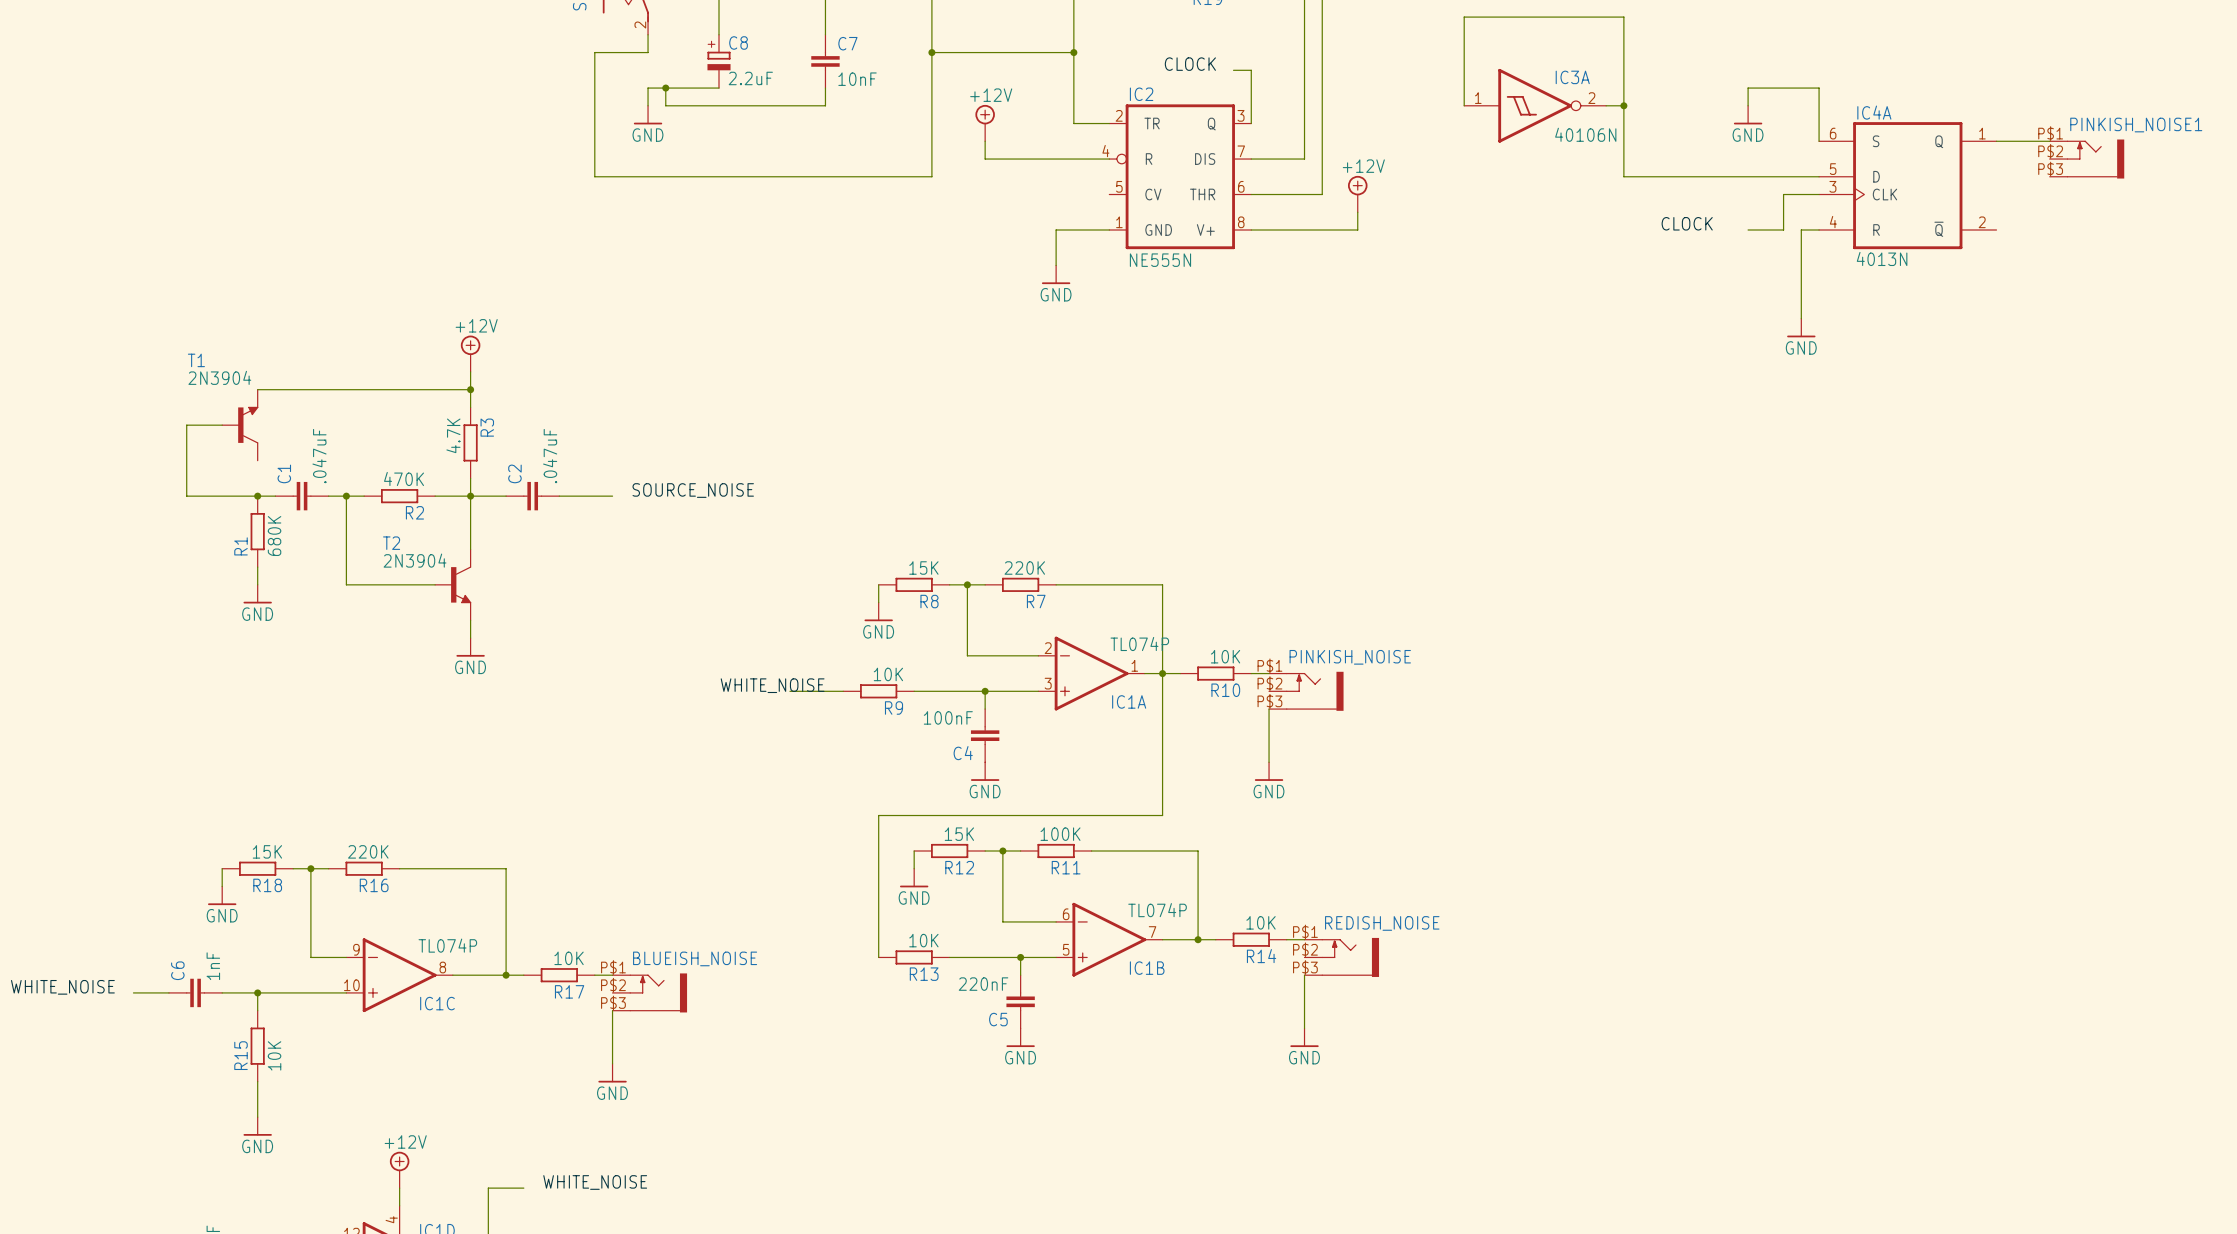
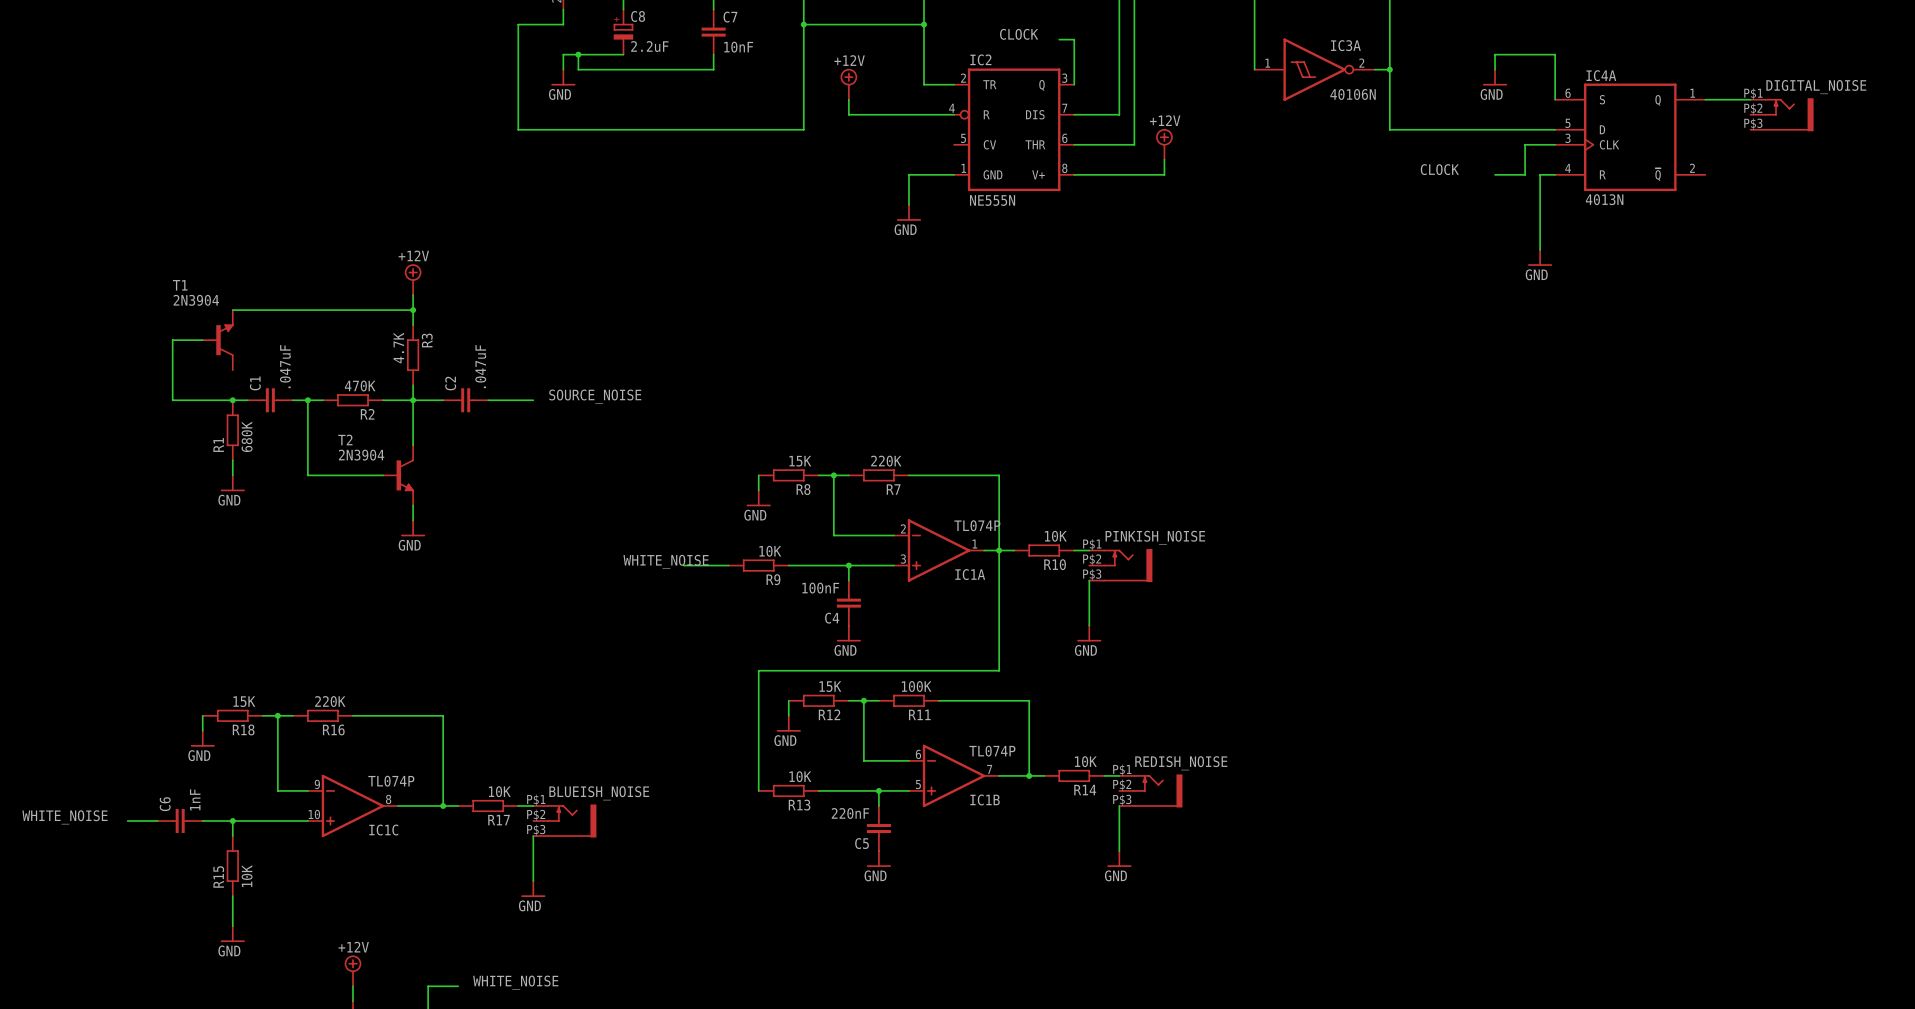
PINKISH_NOISE1 name: PINKISH_NOISE1 (2136, 125) -> DIGITAL_NOISE (1816, 87)

